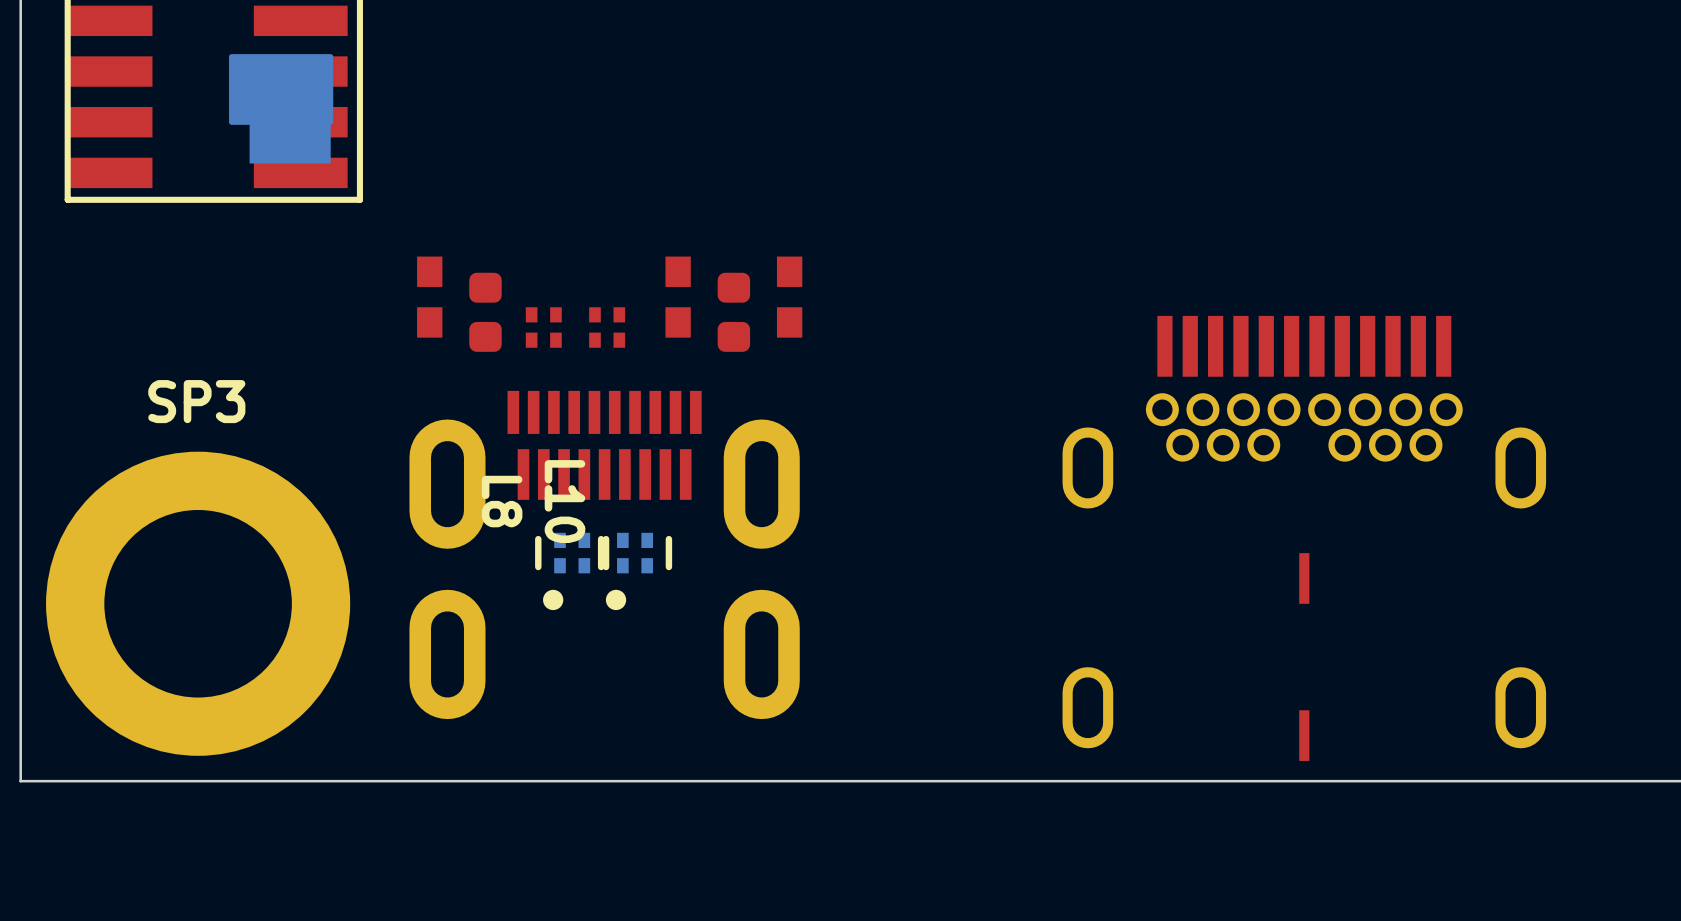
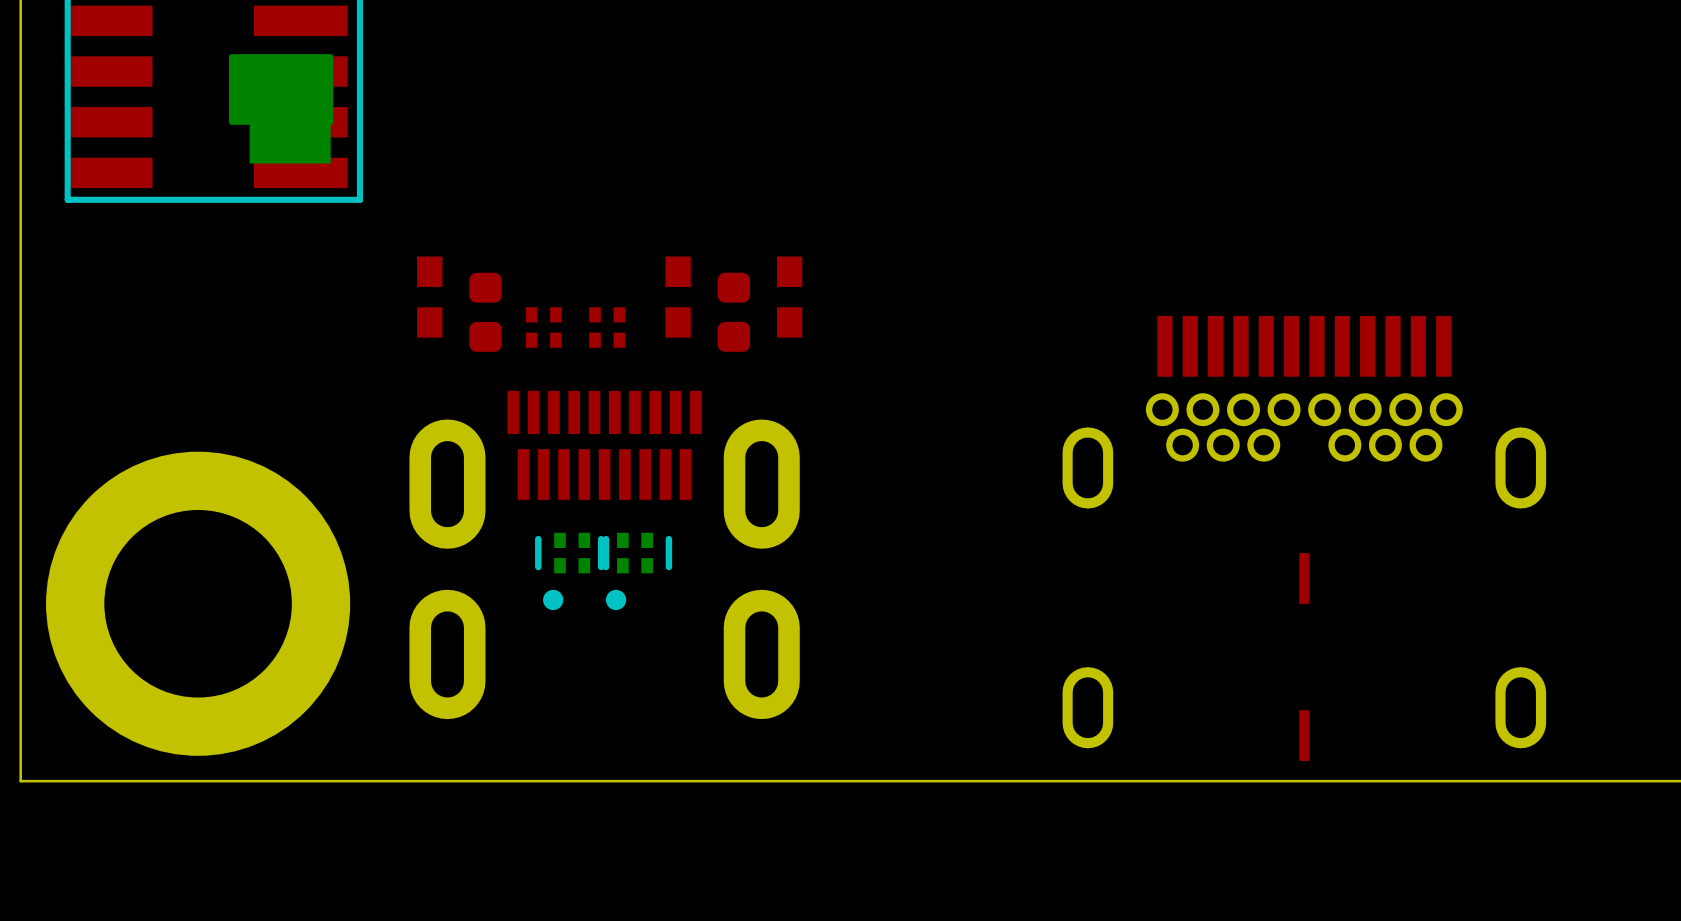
SP3 name: SP3 (196, 401) -> none
L8 name: L8 (502, 501) -> none
L10 name: L10 (564, 501) -> none

